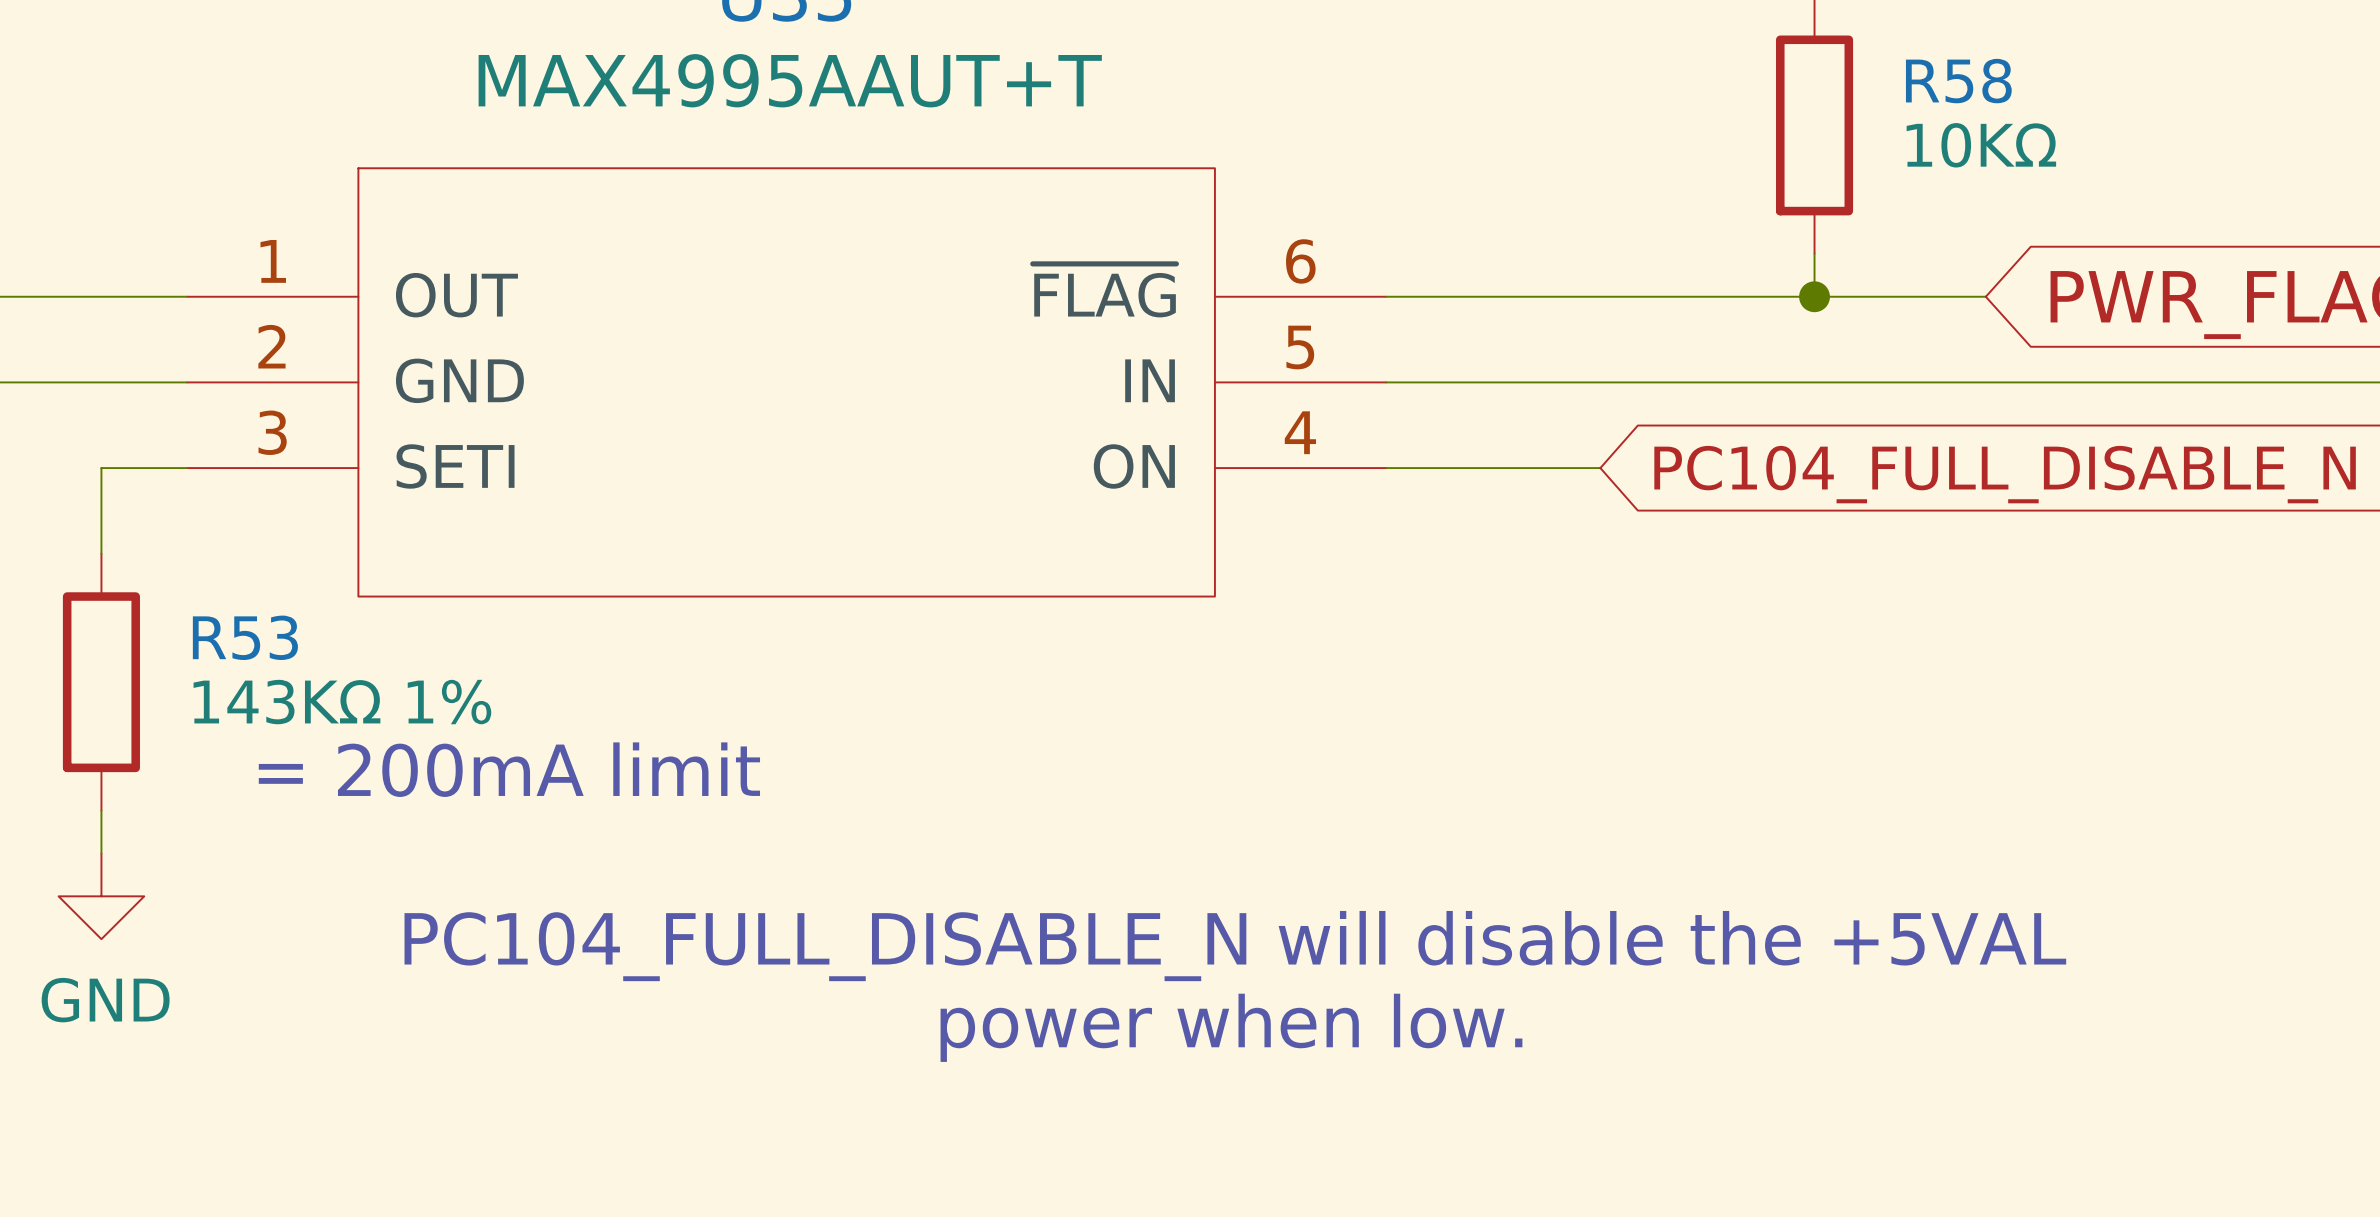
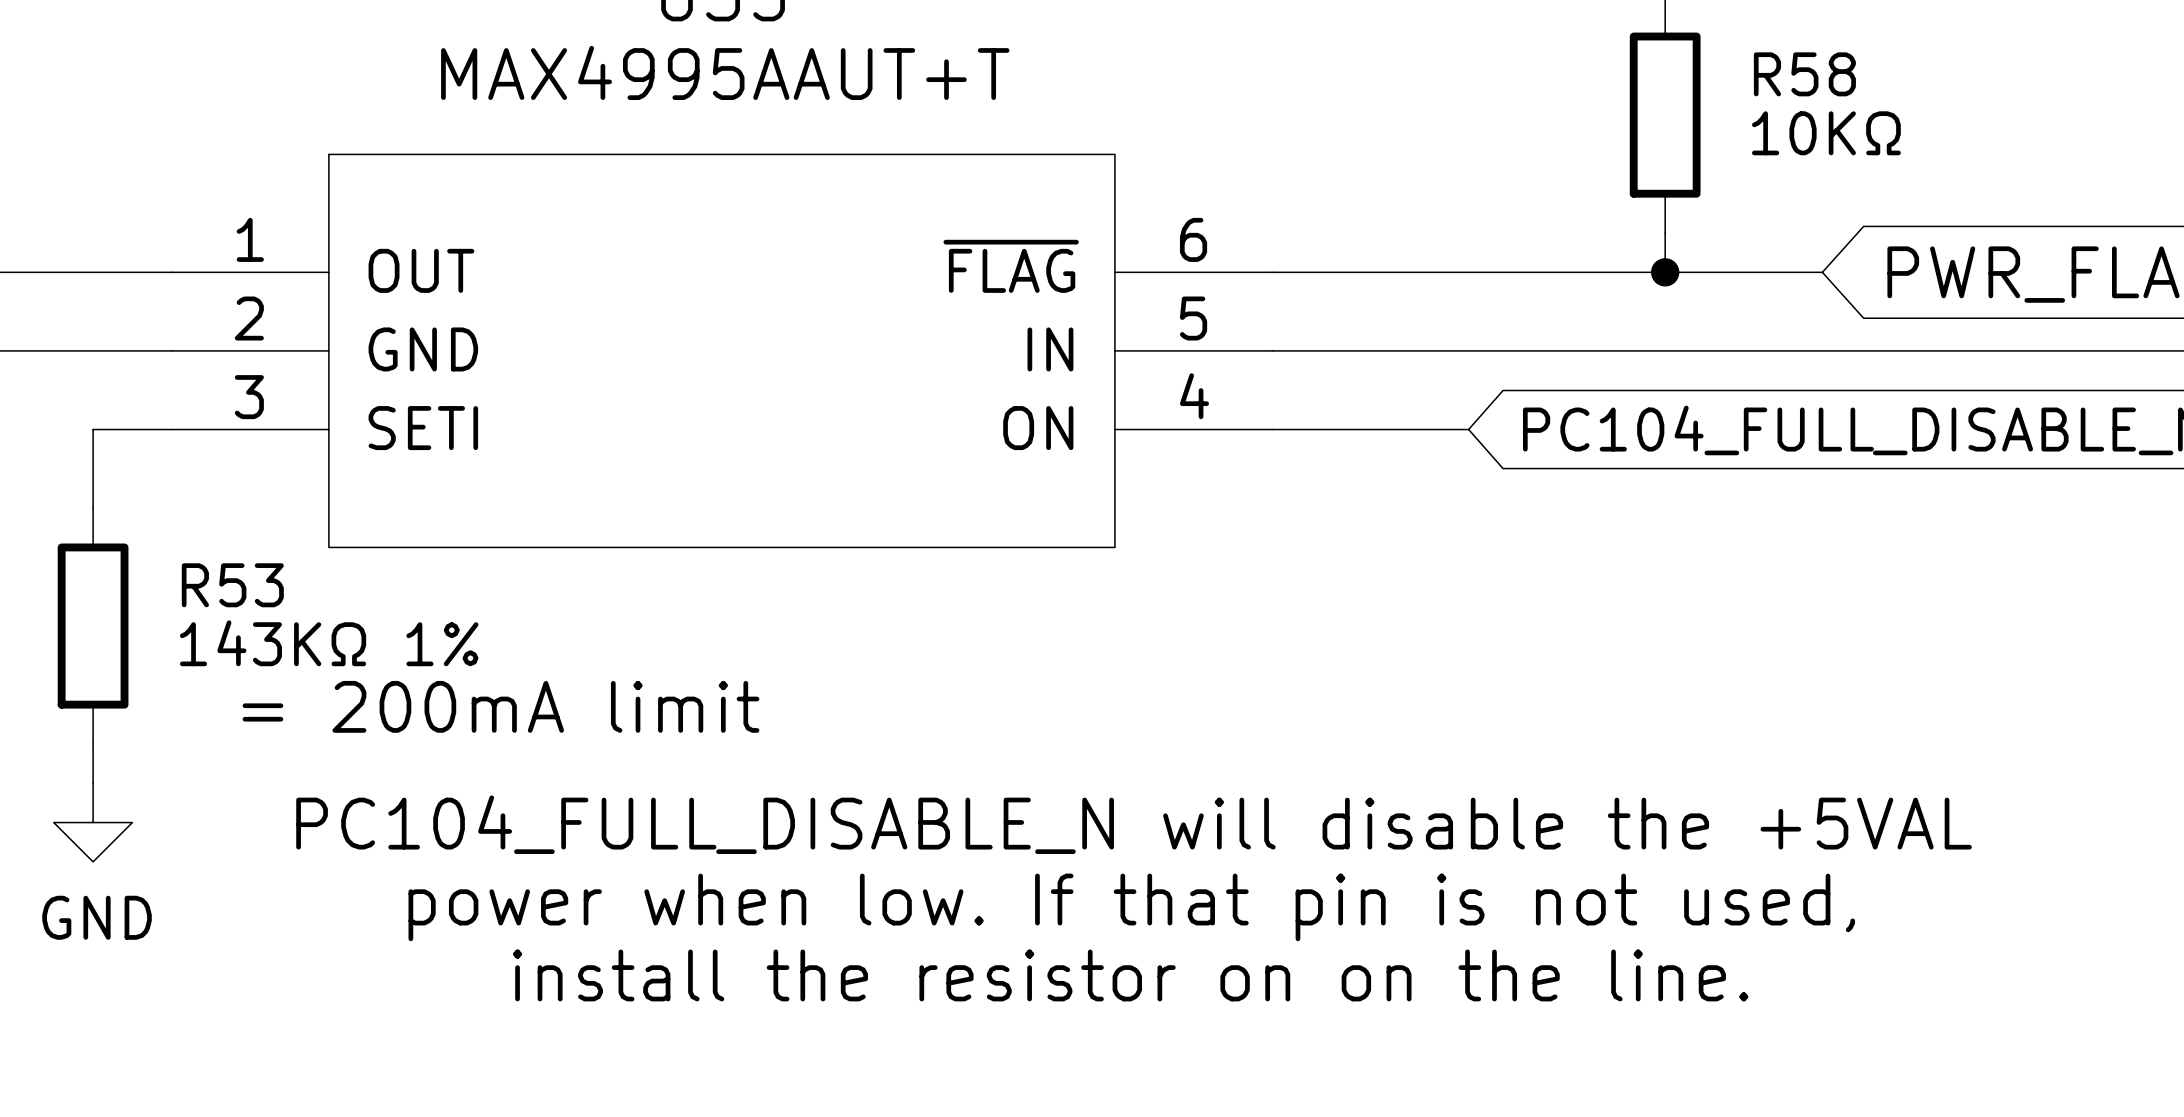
text position: PC104_FULL_DISABLE_N will disable the +5VAL (1235, 946) -> PC104_FULL_DISABLE_N will disable the +5VAL (1134, 824)
text: none -> power when low. If that pin is not used, (1131, 907)
text: power when low. (1231, 1027) -> none
text: none -> install the resistor on on the line. (1130, 975)

